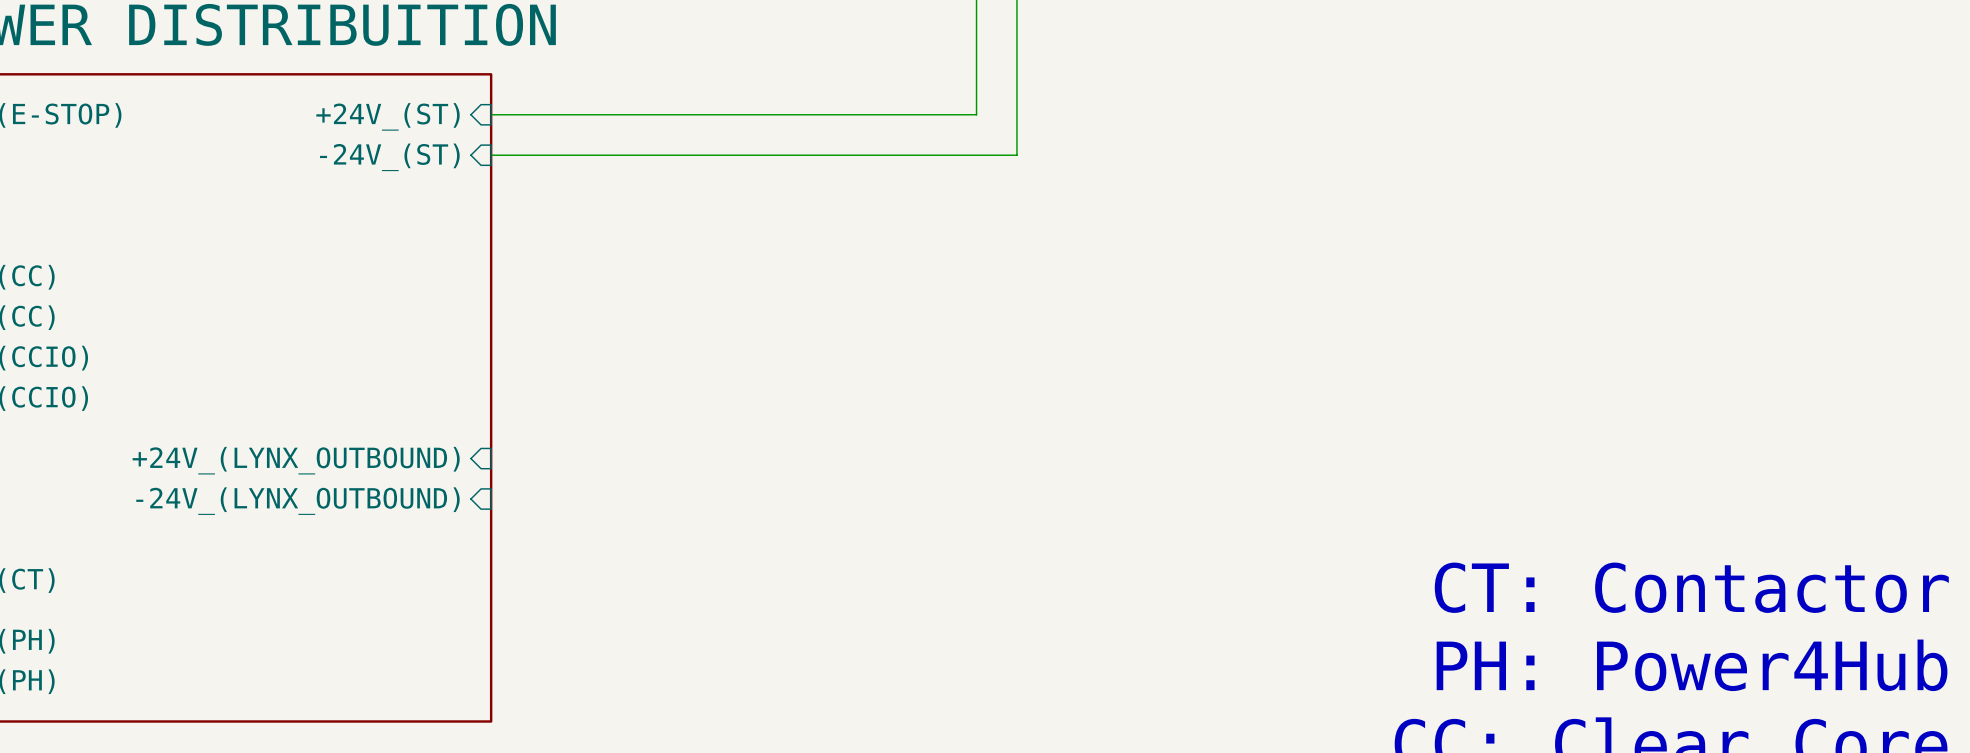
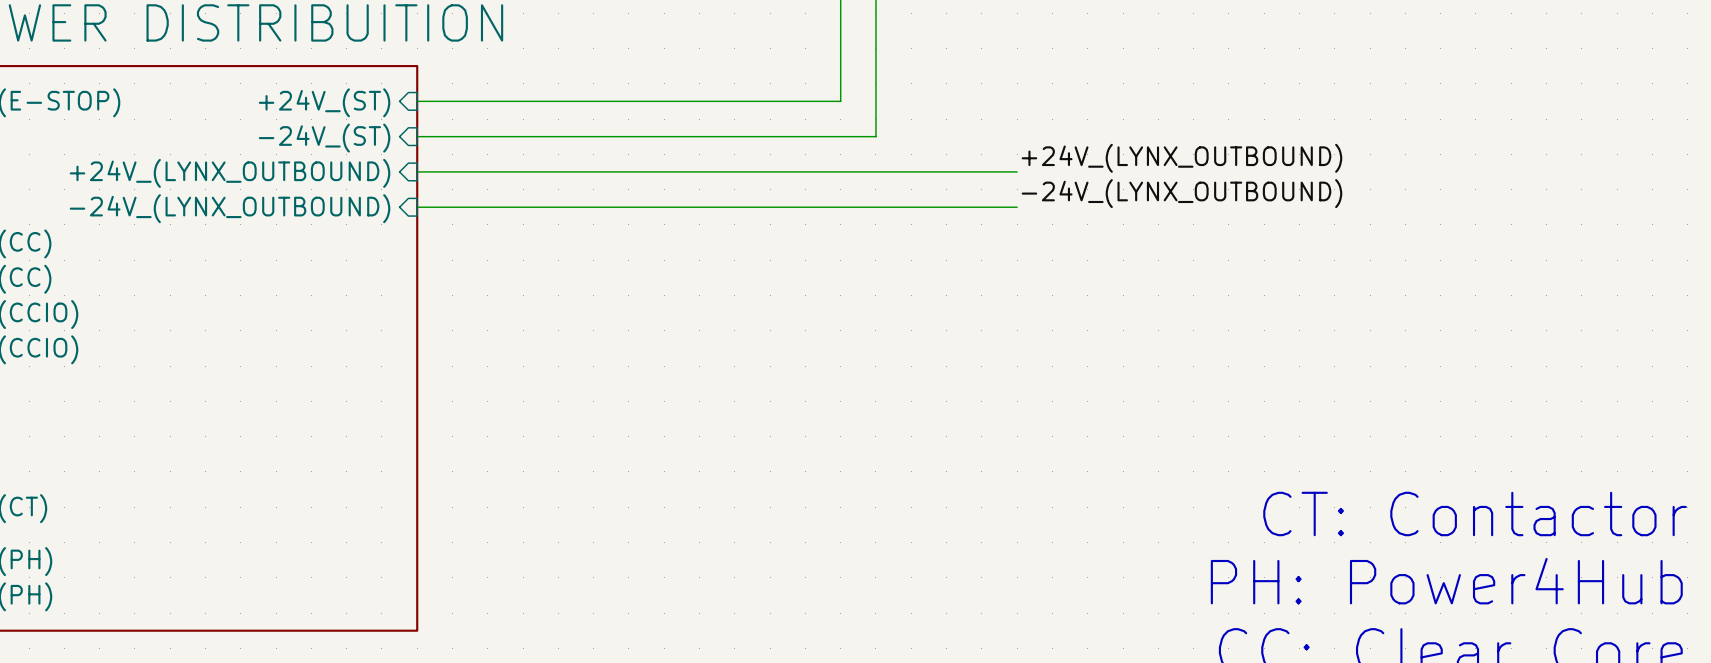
label: none -> +24V_(LYNX_OUTBOUND) (1181, 158)
wire: none -> (417, 171) (1017, 171)
label: none -> -24V_(LYNX_OUTBOUND) (1181, 193)
wire: none -> (417, 207) (1017, 207)
sheet pin position: +24V_(LYNX_OUTBOUND) (296, 460) -> +24V_(LYNX_OUTBOUND) (230, 173)
sheet pin position: -24V_(LYNX_OUTBOUND) (297, 501) -> -24V_(LYNX_OUTBOUND) (230, 208)

